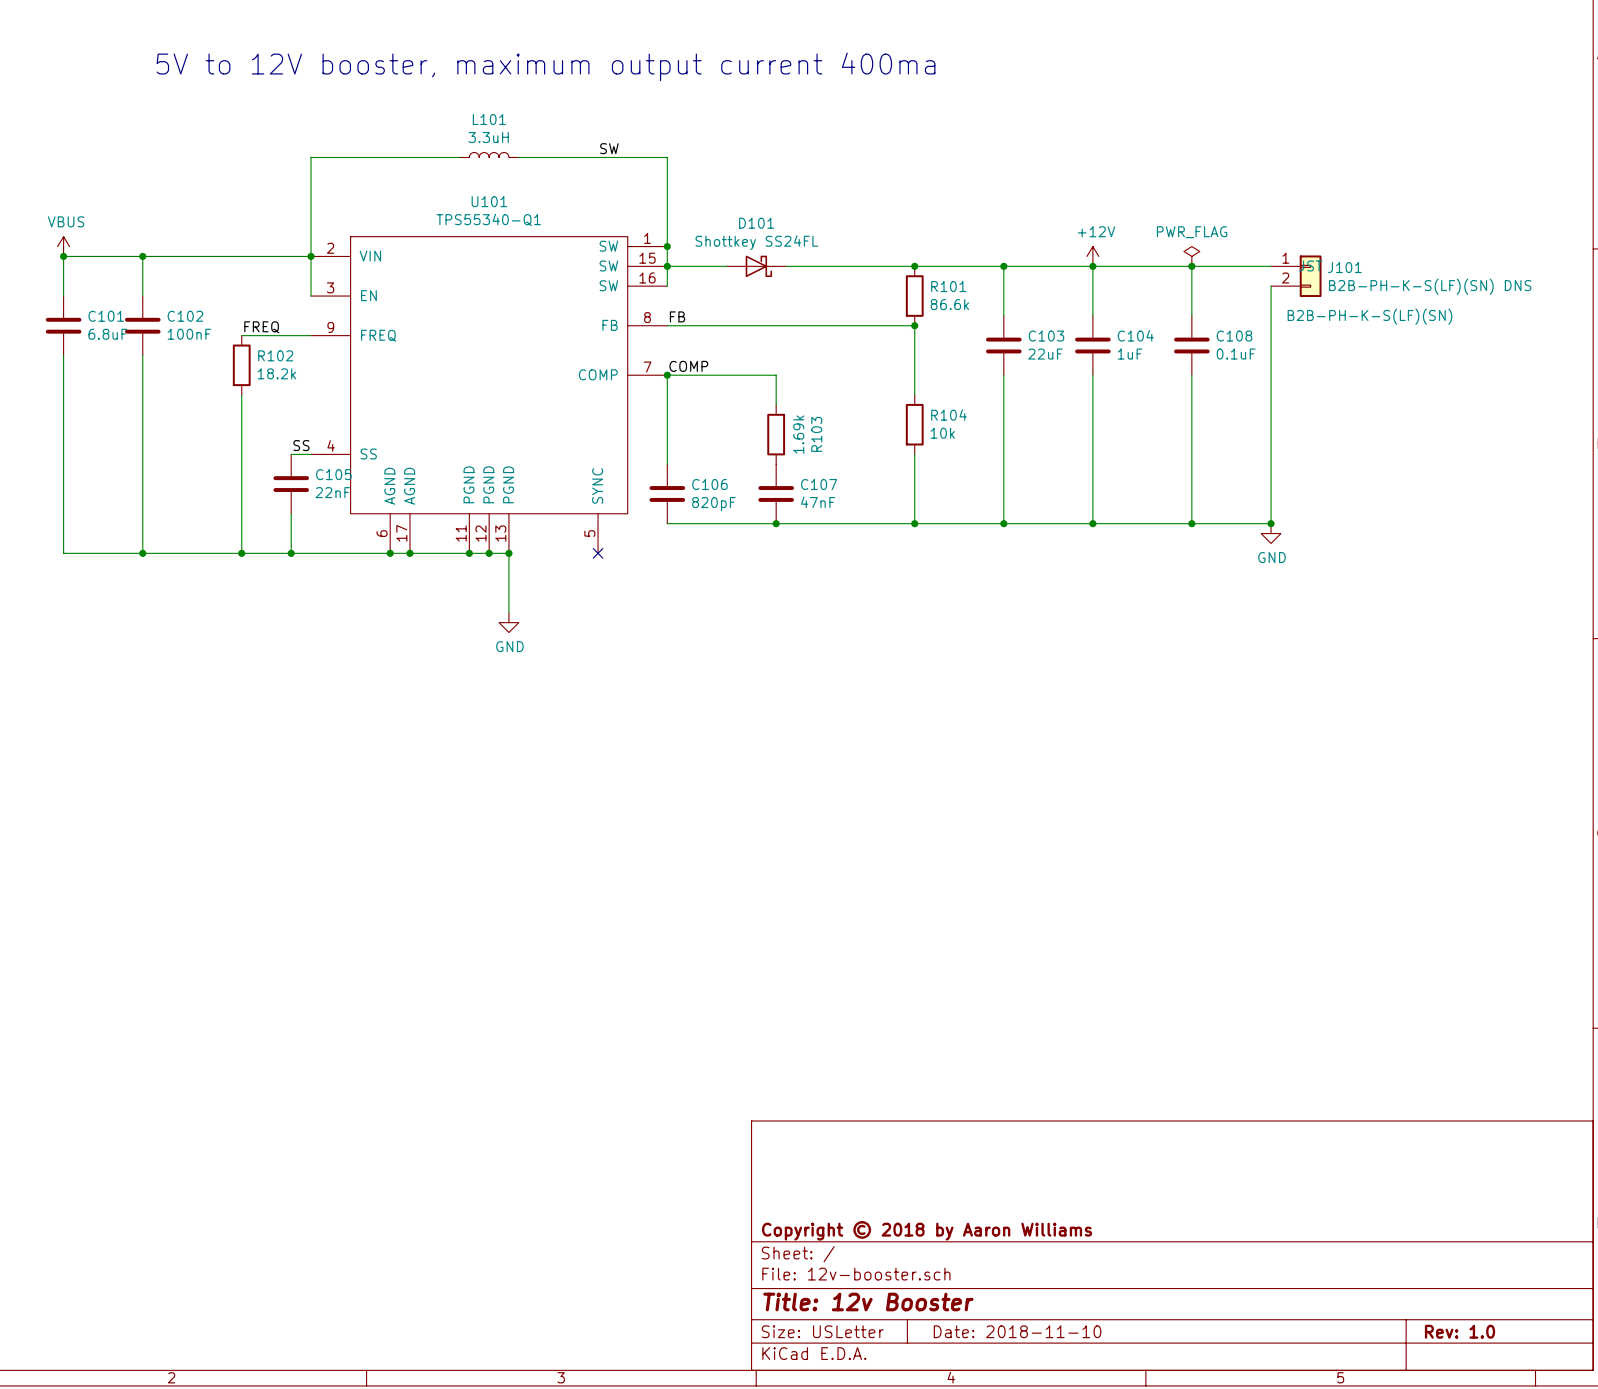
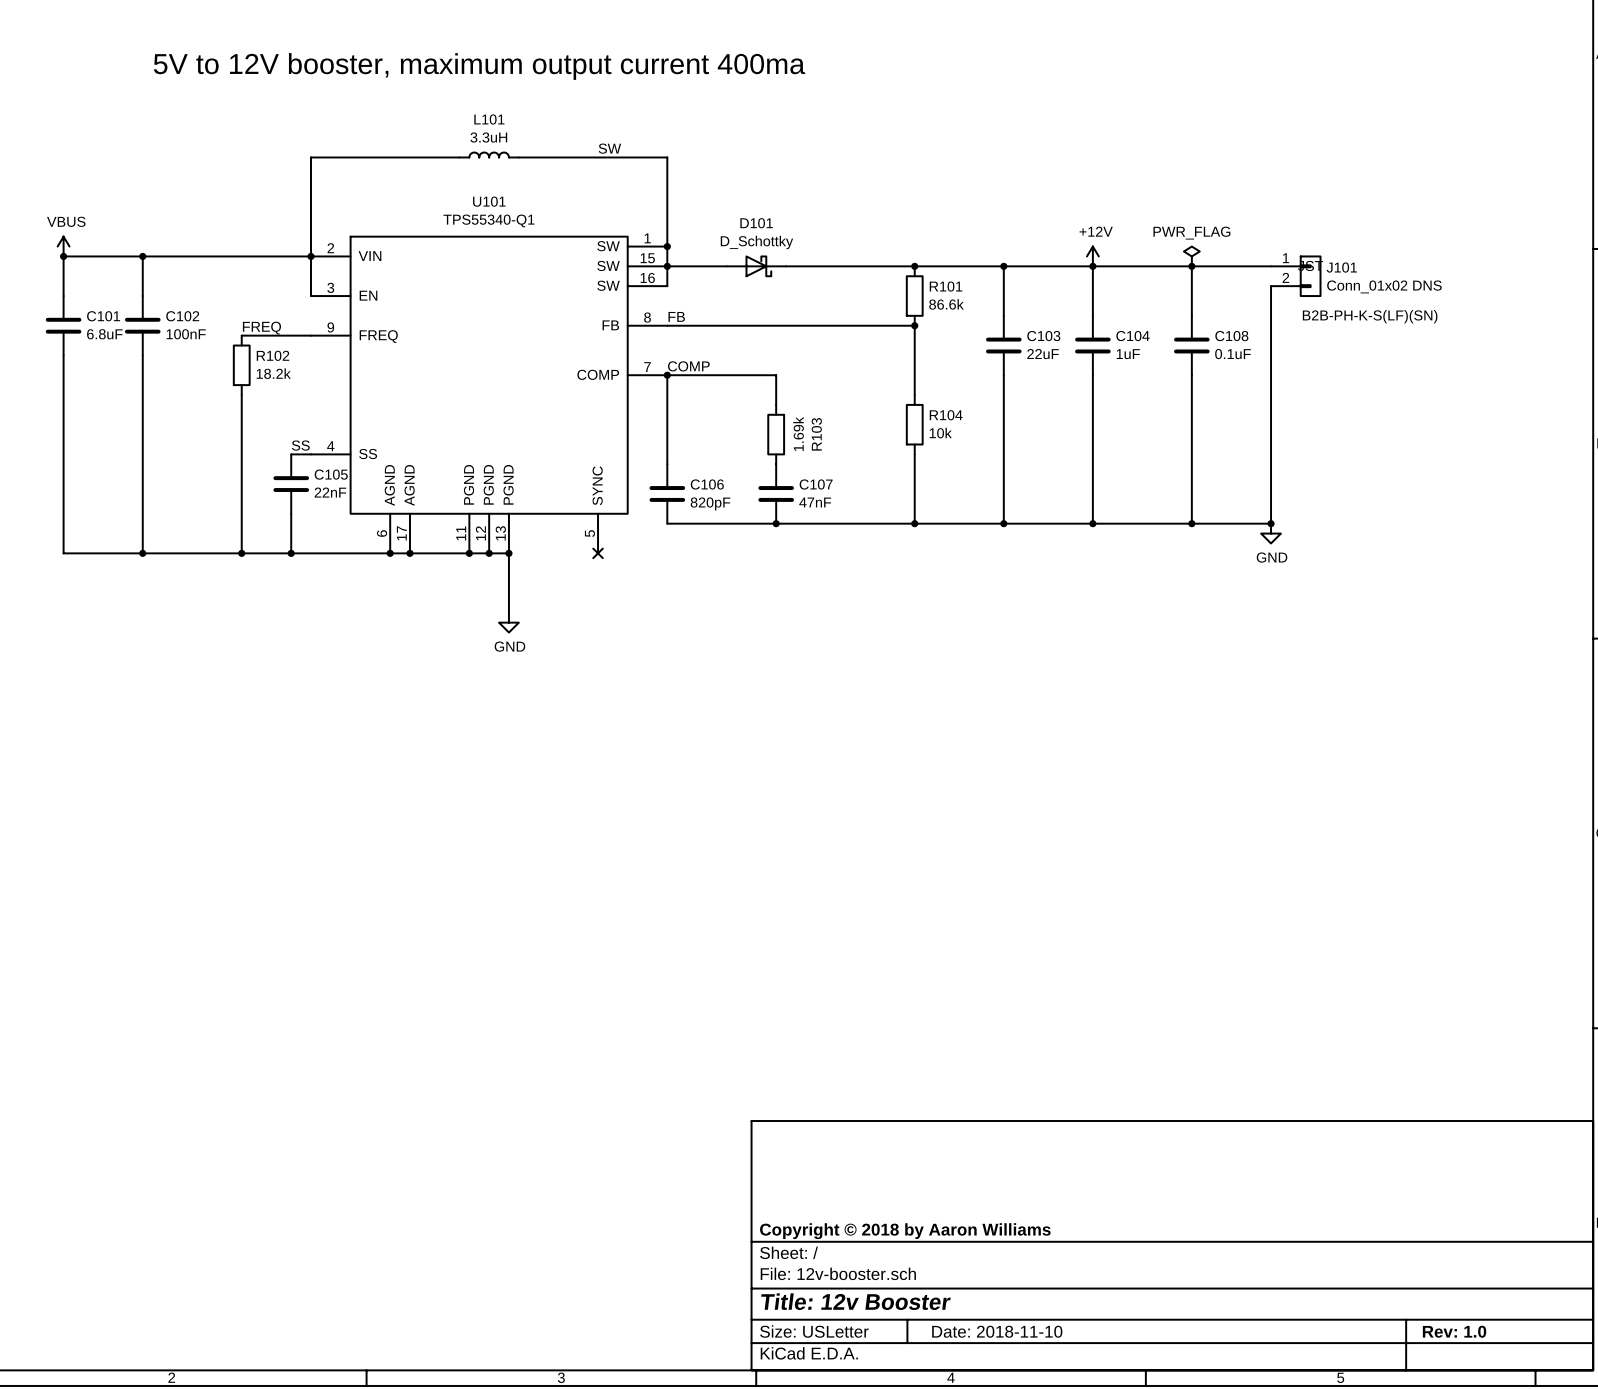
D101 value: Shottkey SS24FL (756, 242) -> D_Schottky (756, 242)
J101 value: B2B-PH-K-S(LF)(SN) DNS (1430, 286) -> Conn_01x02 DNS (1384, 286)

